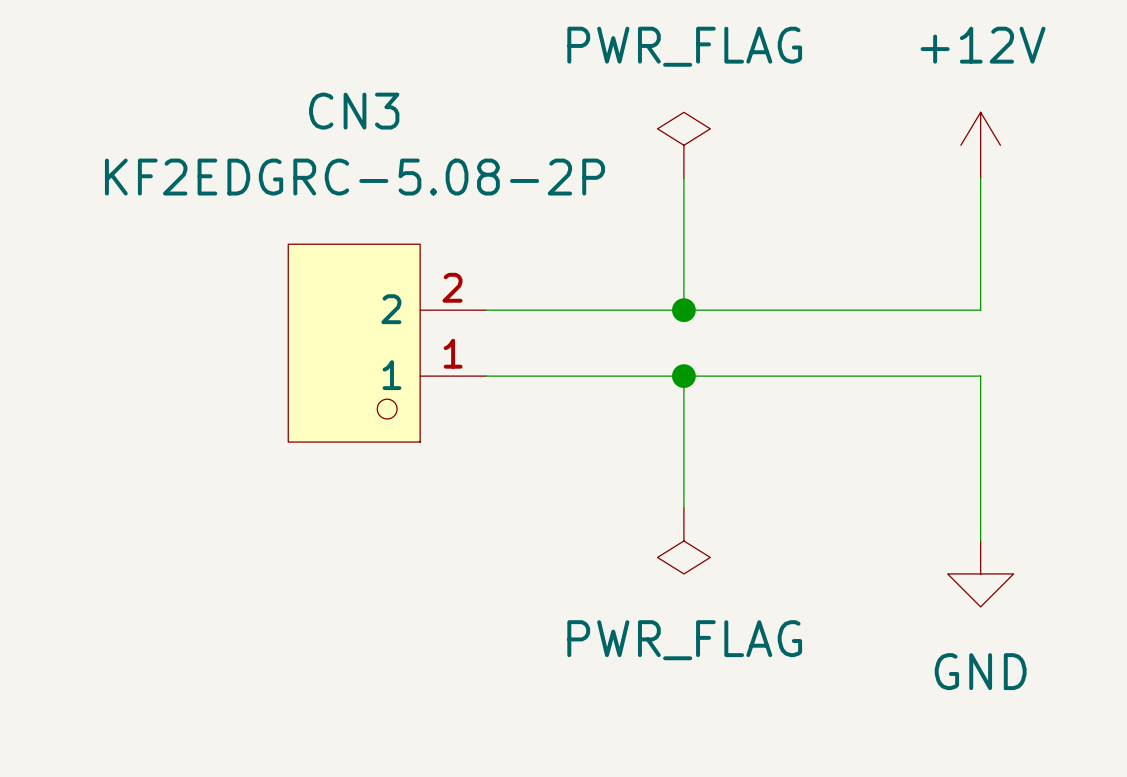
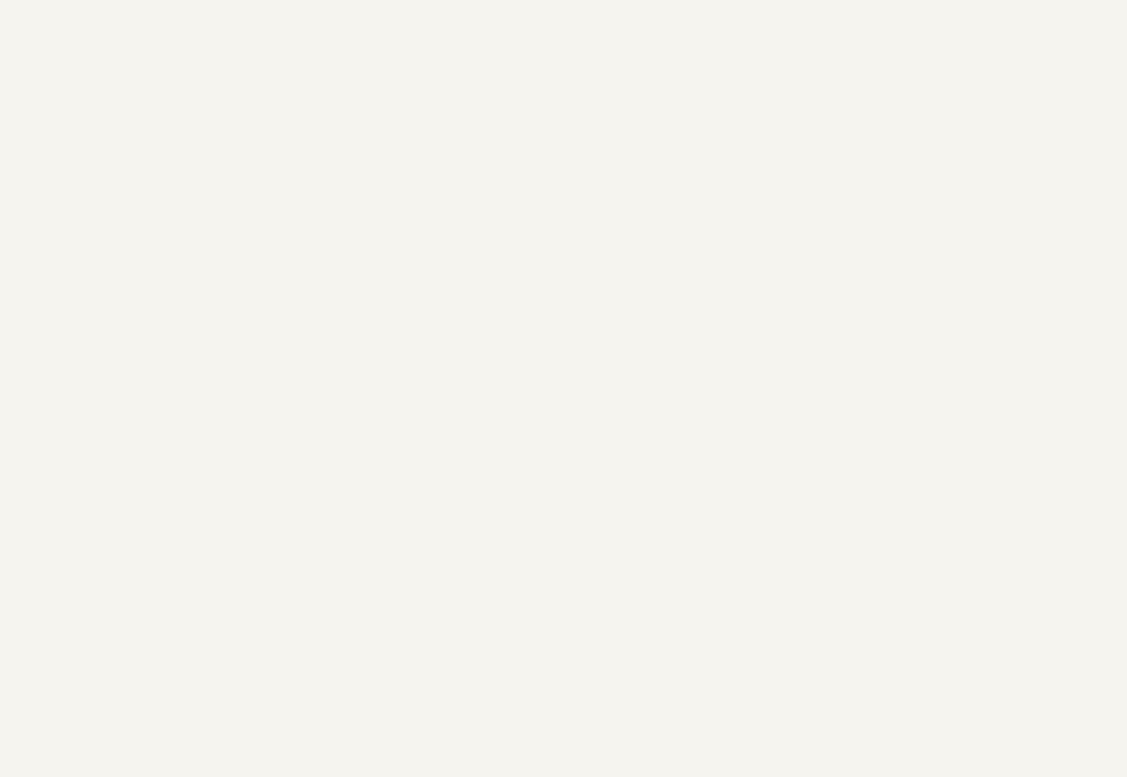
power symbol: PWR_FLAG (683, 145) -> none
power symbol: +12V (980, 145) -> none
wire: (683, 178) (683, 310) -> none
wire: (980, 178) (980, 310) (486, 310) -> none
junction: (683, 310) -> none
CN3: KF2EDGRC-5.08-2P (387, 343) -> none
wire: (486, 376) (980, 376) (980, 540) -> none
wire: (683, 376) (683, 507) -> none
junction: (683, 376) -> none
power symbol: PWR_FLAG (683, 540) -> none
power symbol: GND (980, 573) -> none

